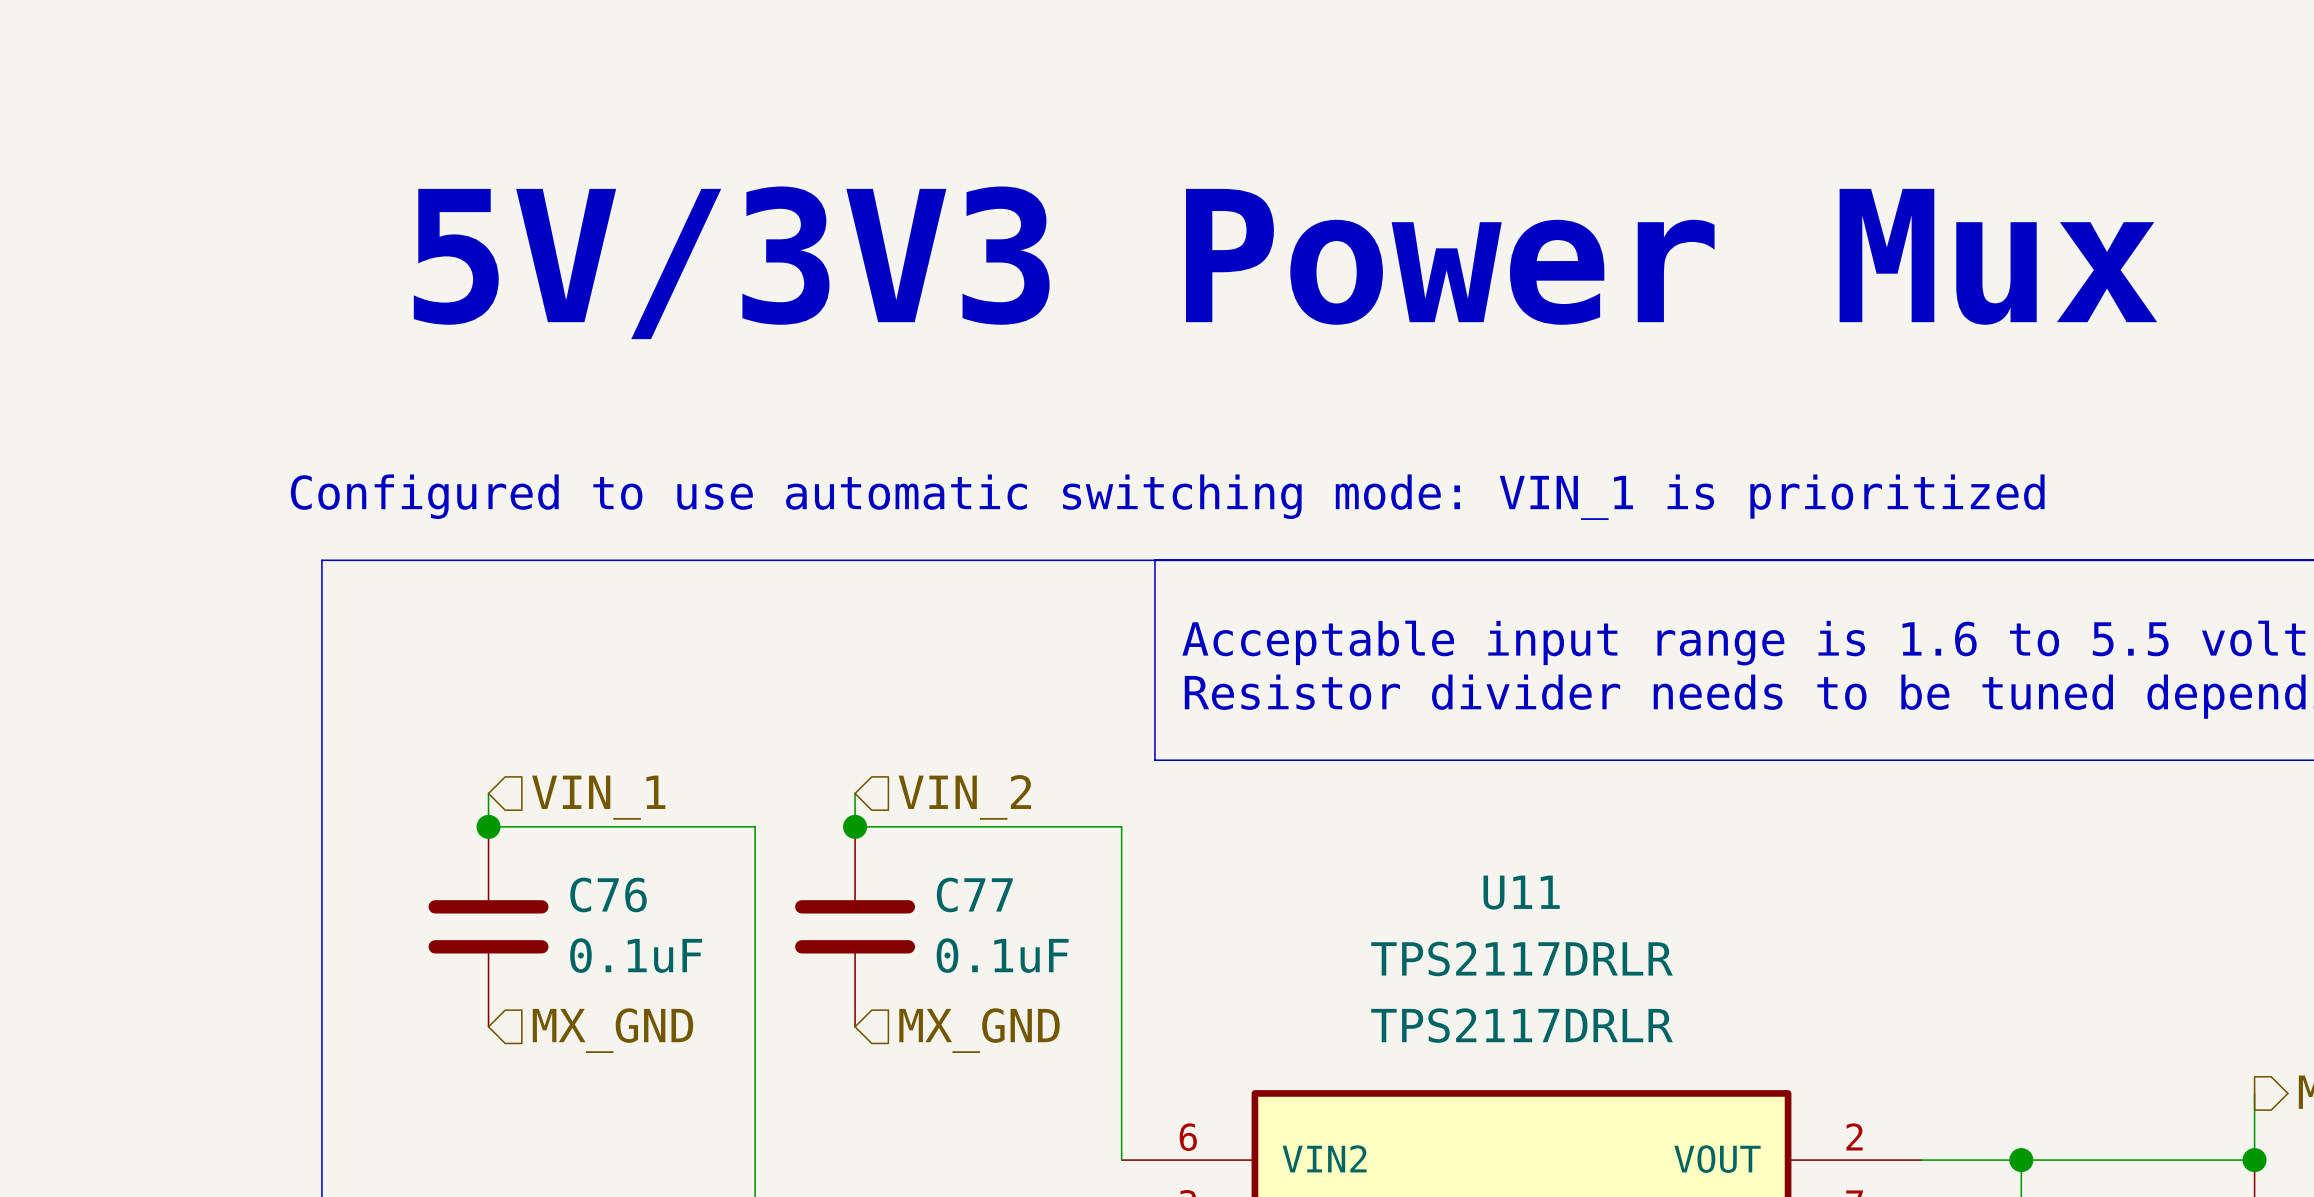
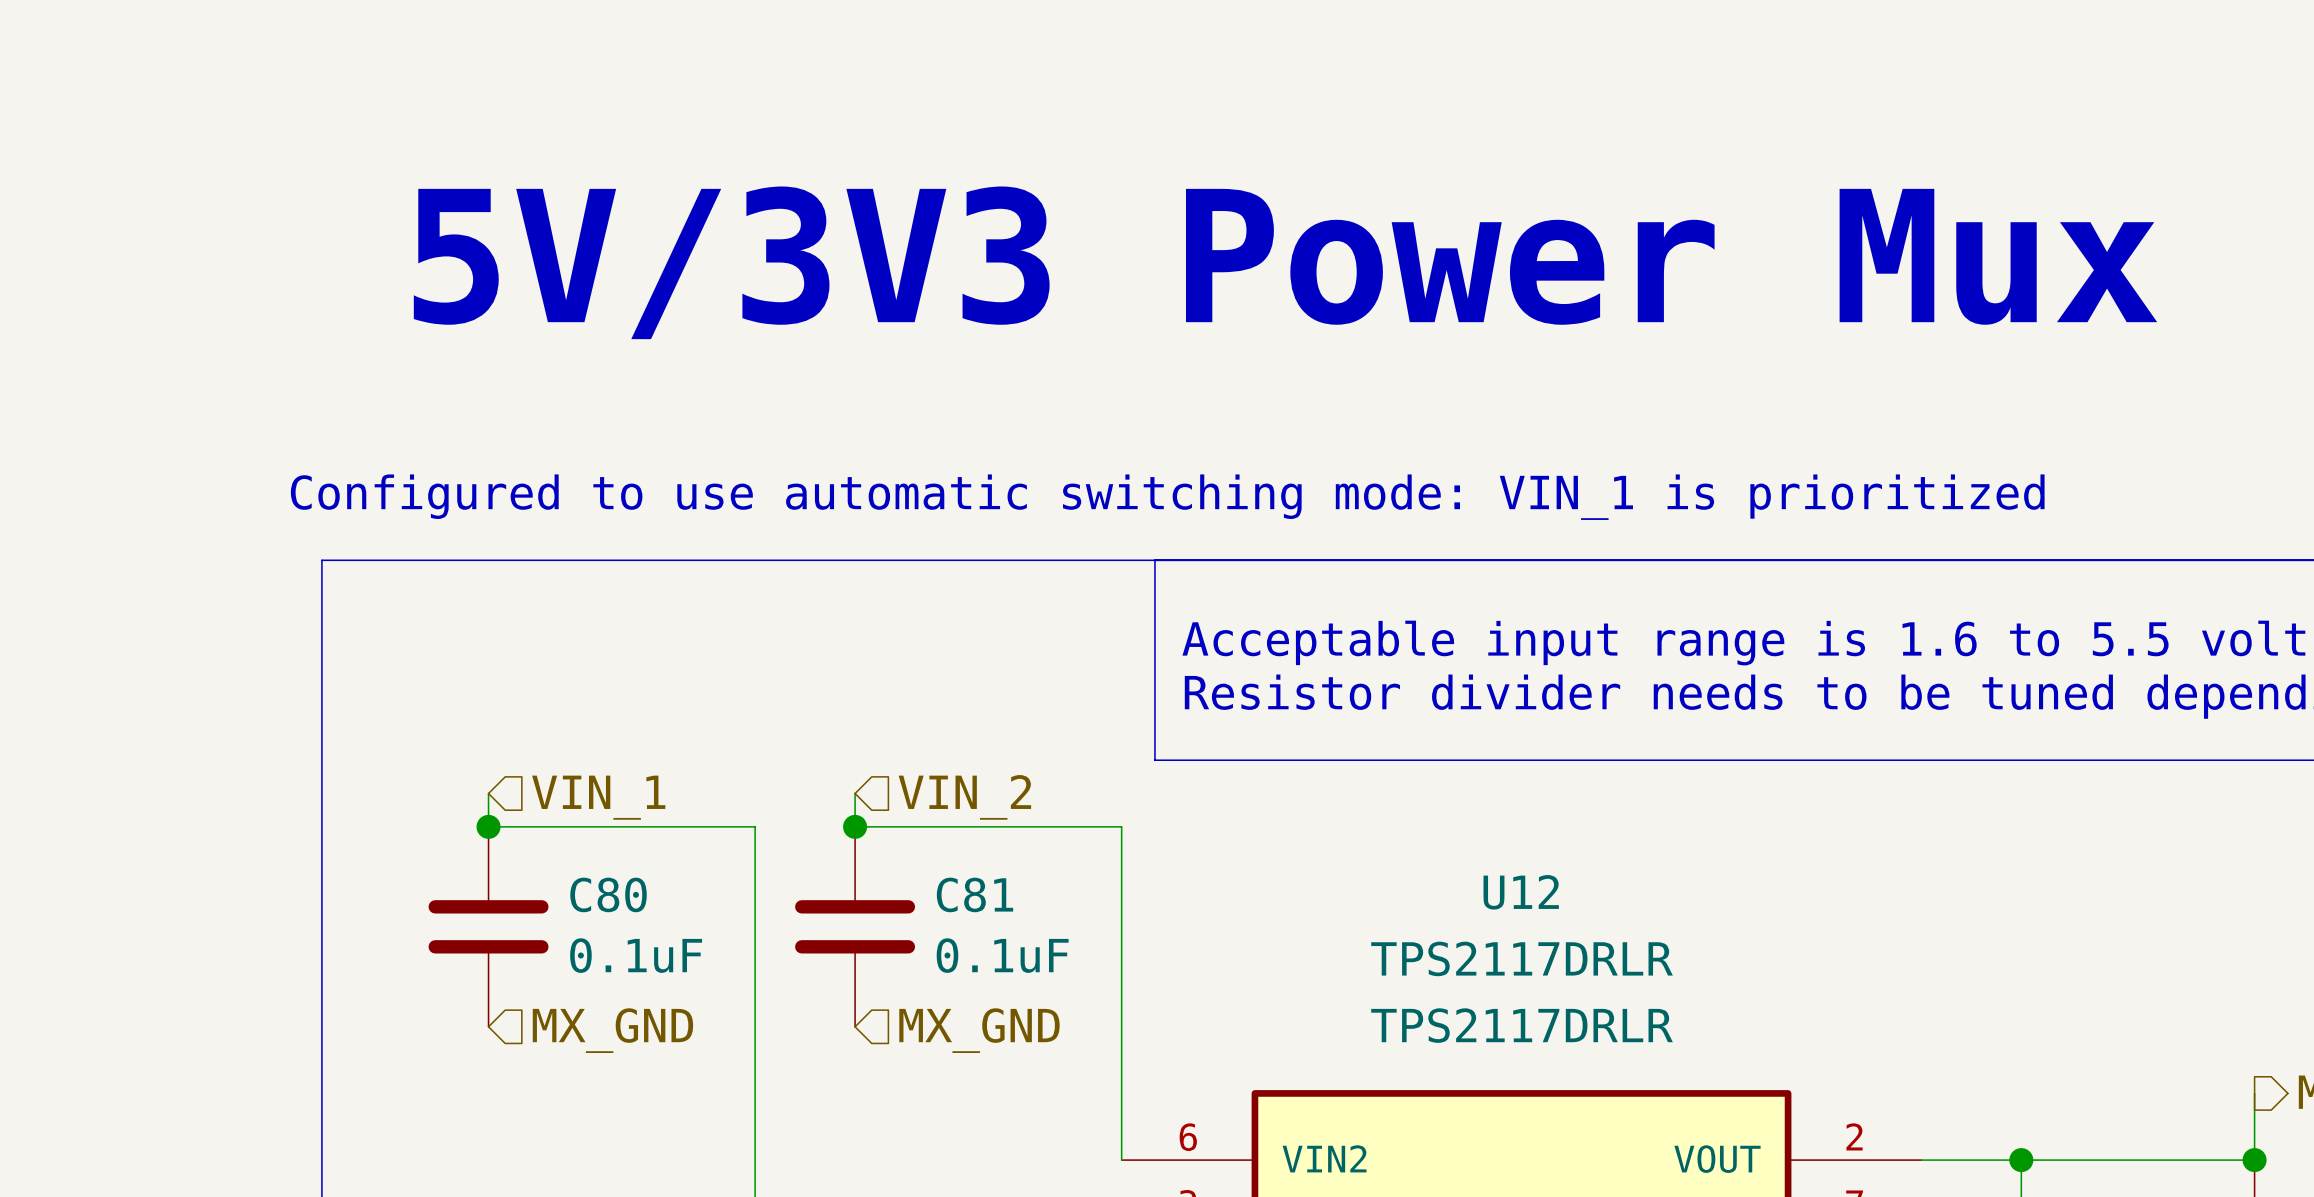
U11 name: U11 (1521, 892) -> U12 (1521, 892)
C76 name: C76 (608, 894) -> C80 (608, 894)
C77 name: C77 (974, 894) -> C81 (974, 894)

